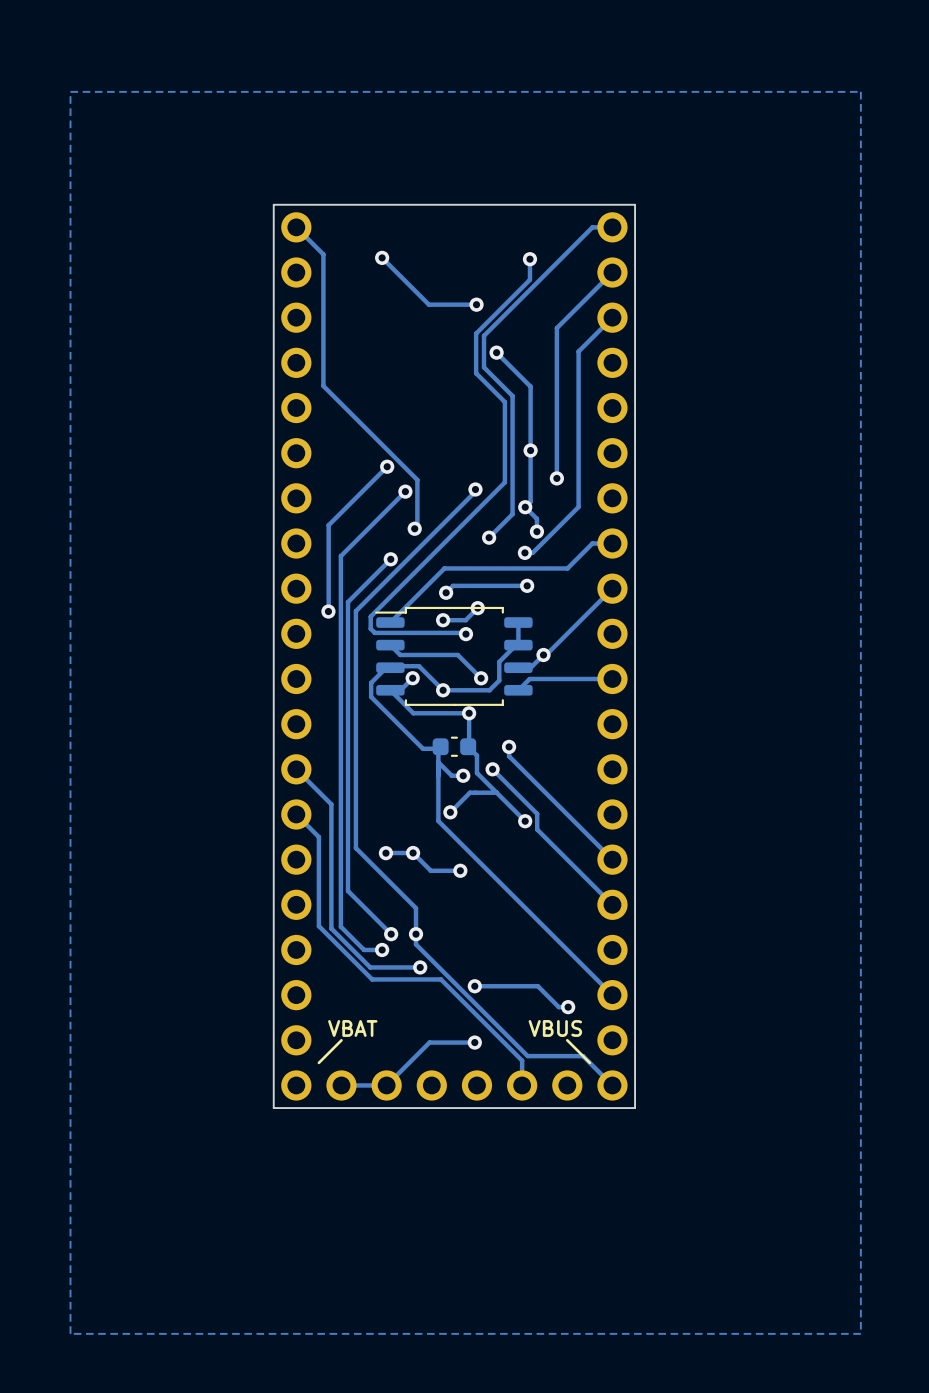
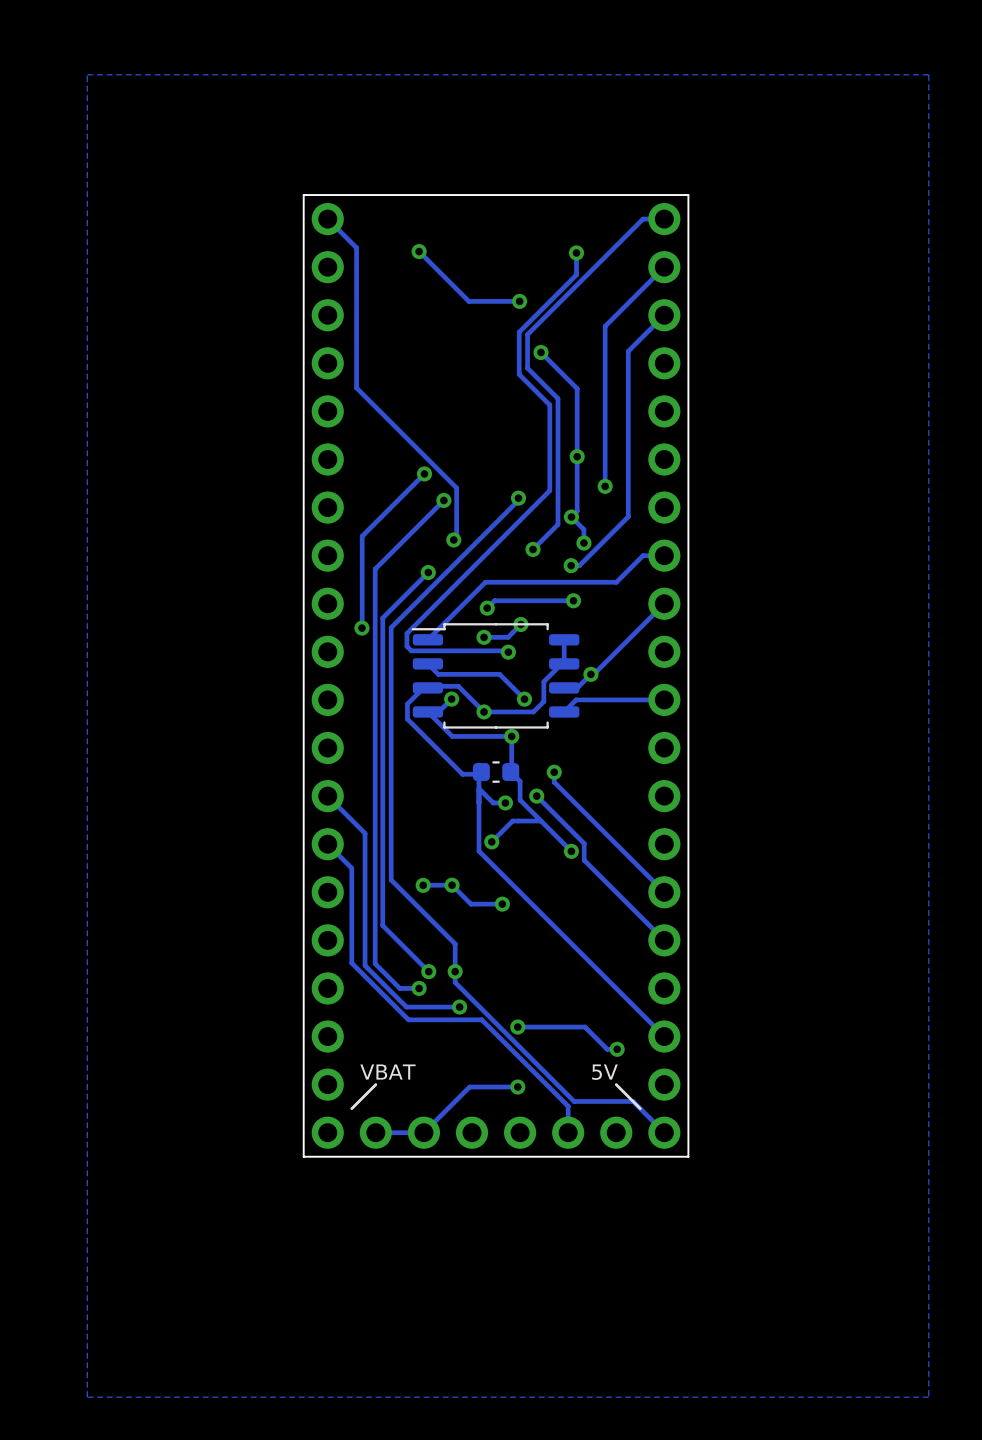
text: VBUS (555, 1028) -> 5V (604, 1072)

